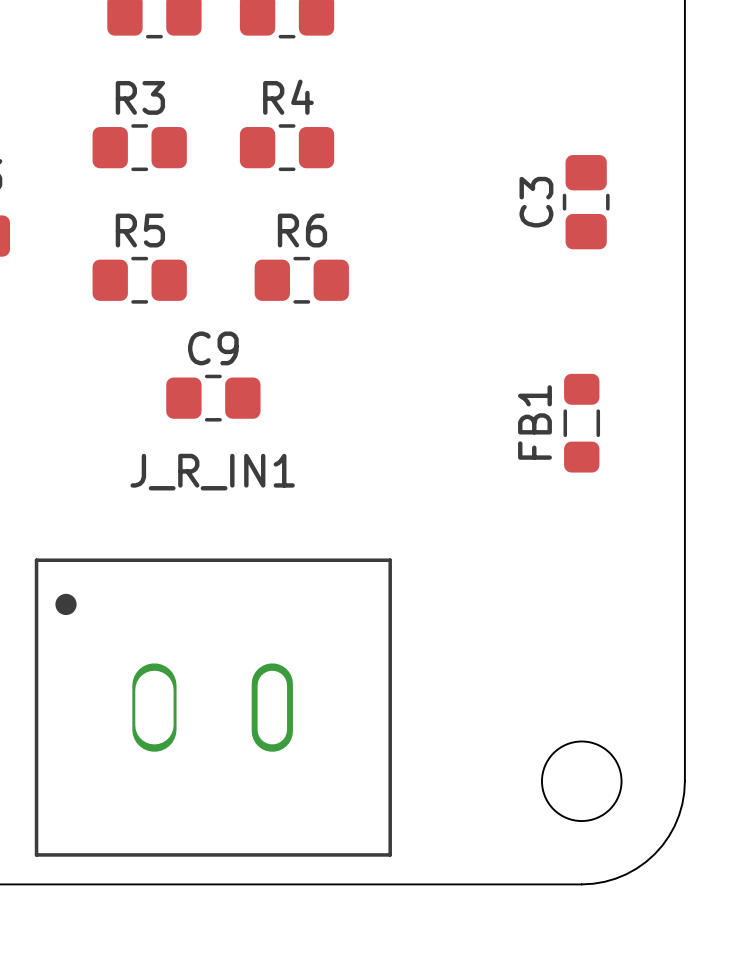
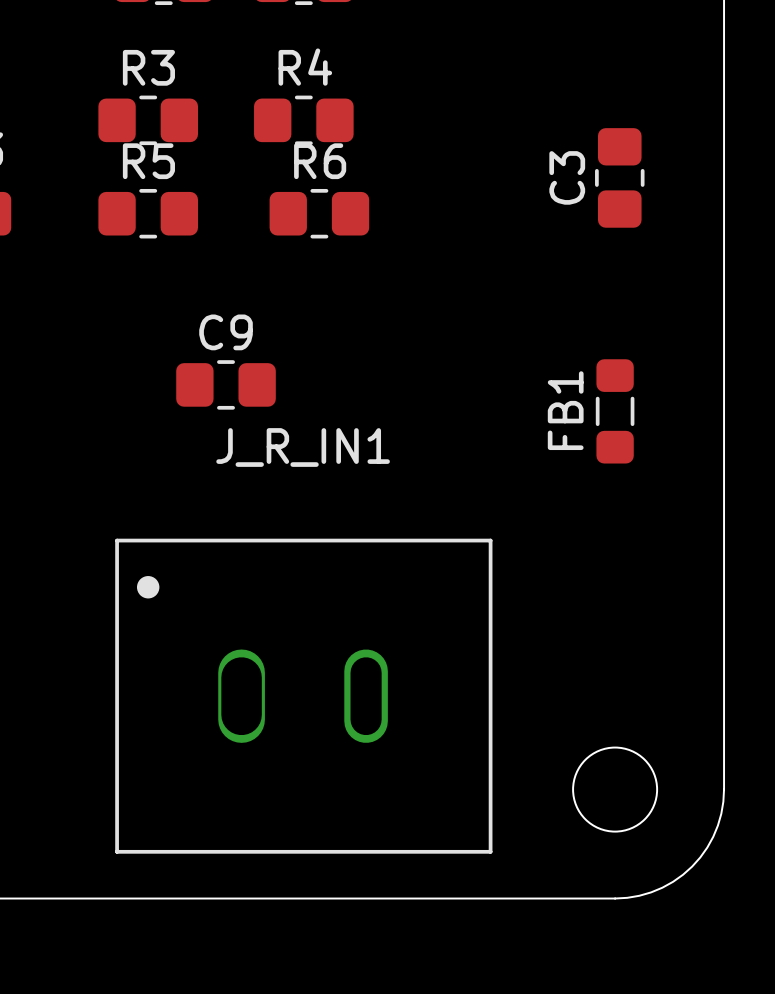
R5 position: (139, 280) -> (148, 213)
R6 position: (301, 280) -> (319, 213)
J_R_IN1 position: (213, 707) -> (303, 696)

